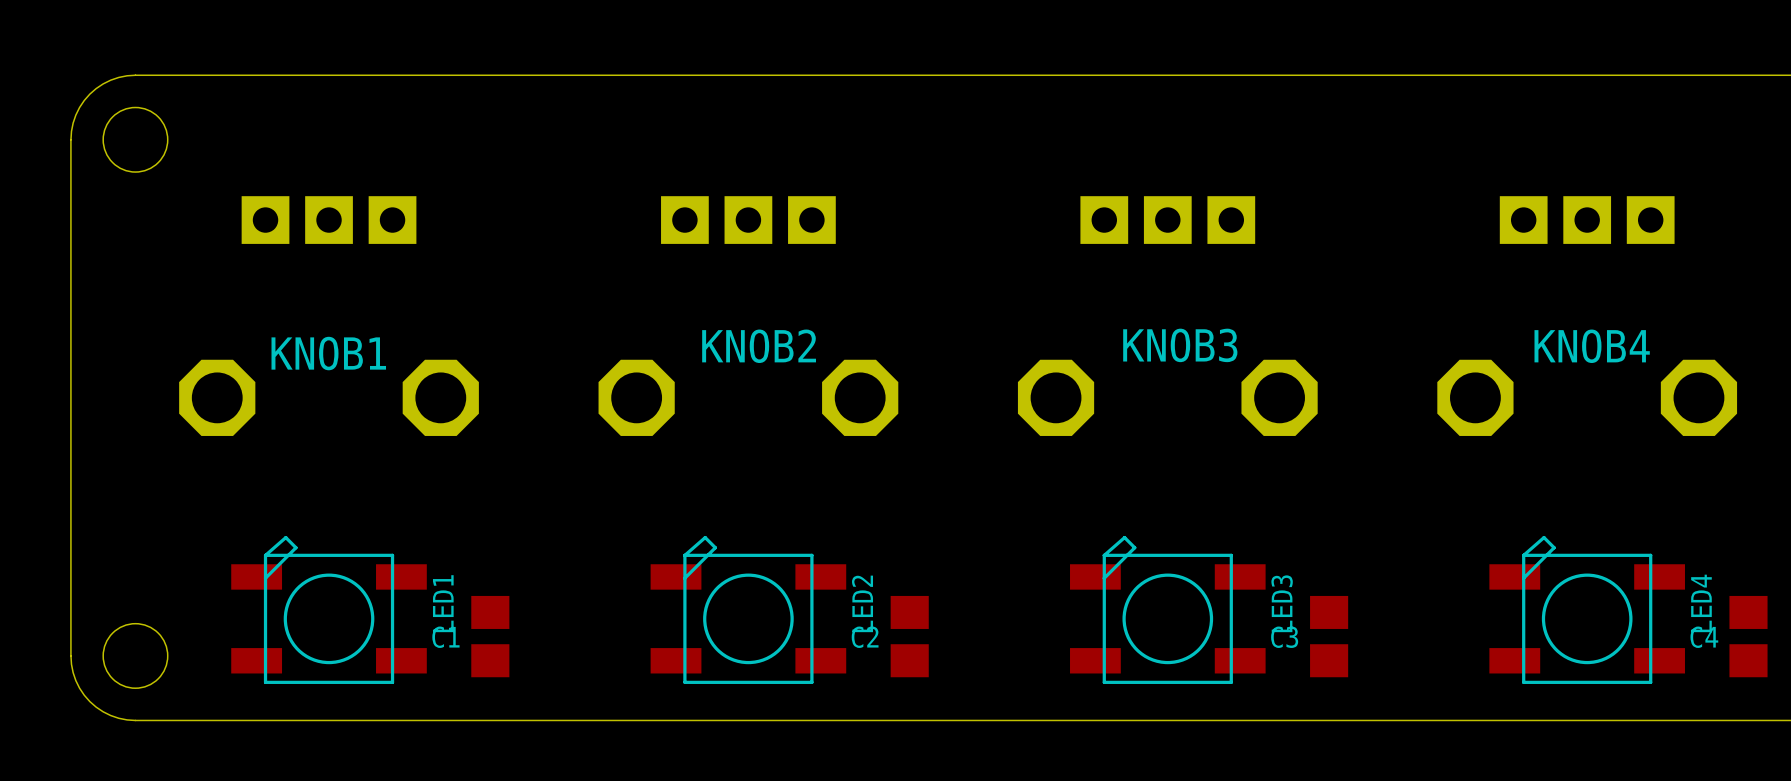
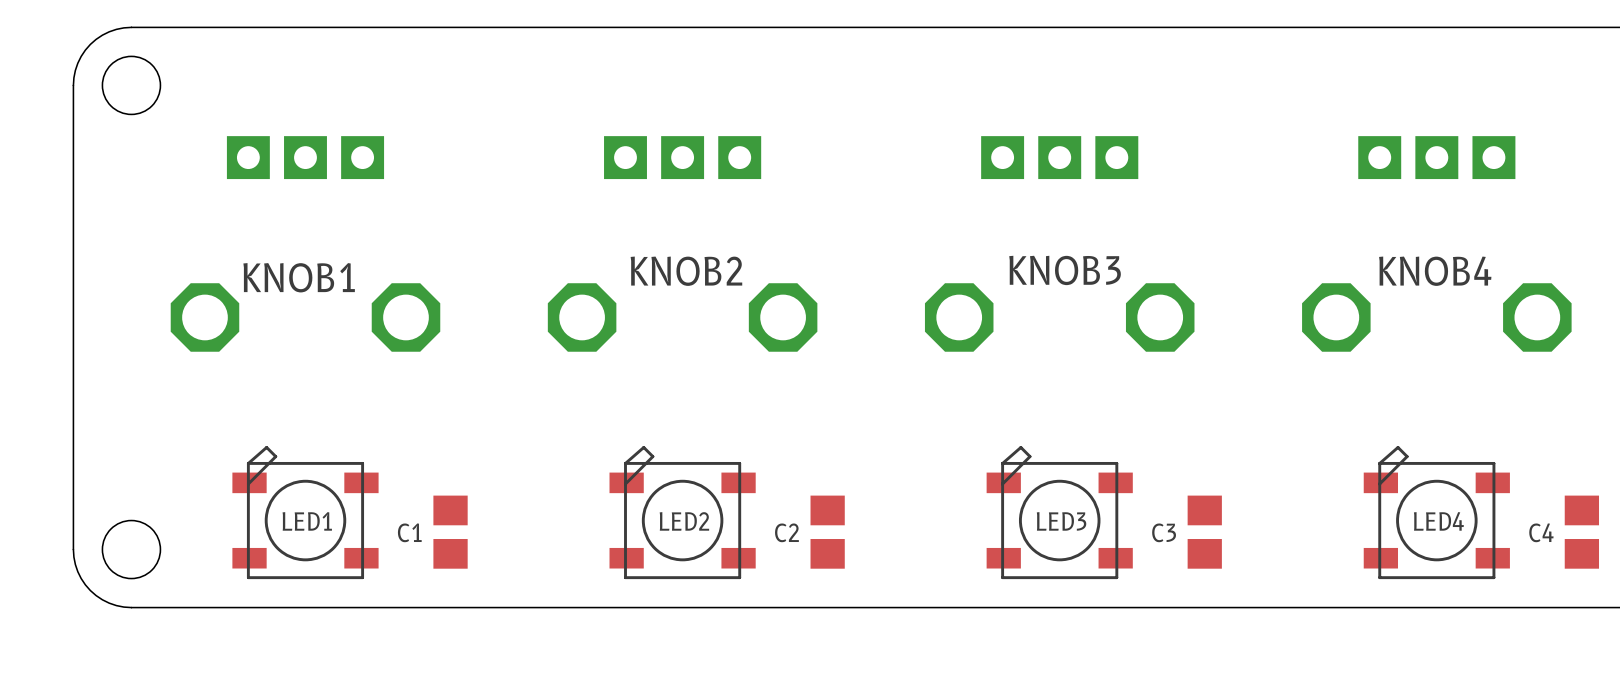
LED1 footprint: [231, 535, 427, 684] -> [232, 446, 379, 580]
LED2 footprint: [650, 535, 847, 684] -> [609, 446, 756, 580]
LED3 footprint: [1070, 535, 1266, 684] -> [986, 446, 1133, 580]
LED4 footprint: [1489, 535, 1685, 684] -> [1363, 446, 1510, 580]
LED1 name rotation: 0° (443, 603) -> 90° clockwise (307, 521)
LED1 name position: LED1 (443, 603) -> LED1 (307, 521)
LED2 name rotation: 0° (862, 603) -> 90° clockwise (684, 521)
LED2 name position: LED2 (862, 603) -> LED2 (684, 521)
LED3 name rotation: 0° (1282, 603) -> 90° clockwise (1061, 521)
LED3 name position: LED3 (1282, 603) -> LED3 (1061, 521)
LED4 name rotation: 0° (1701, 603) -> 90° clockwise (1438, 521)
LED4 name position: LED4 (1701, 603) -> LED4 (1438, 521)

